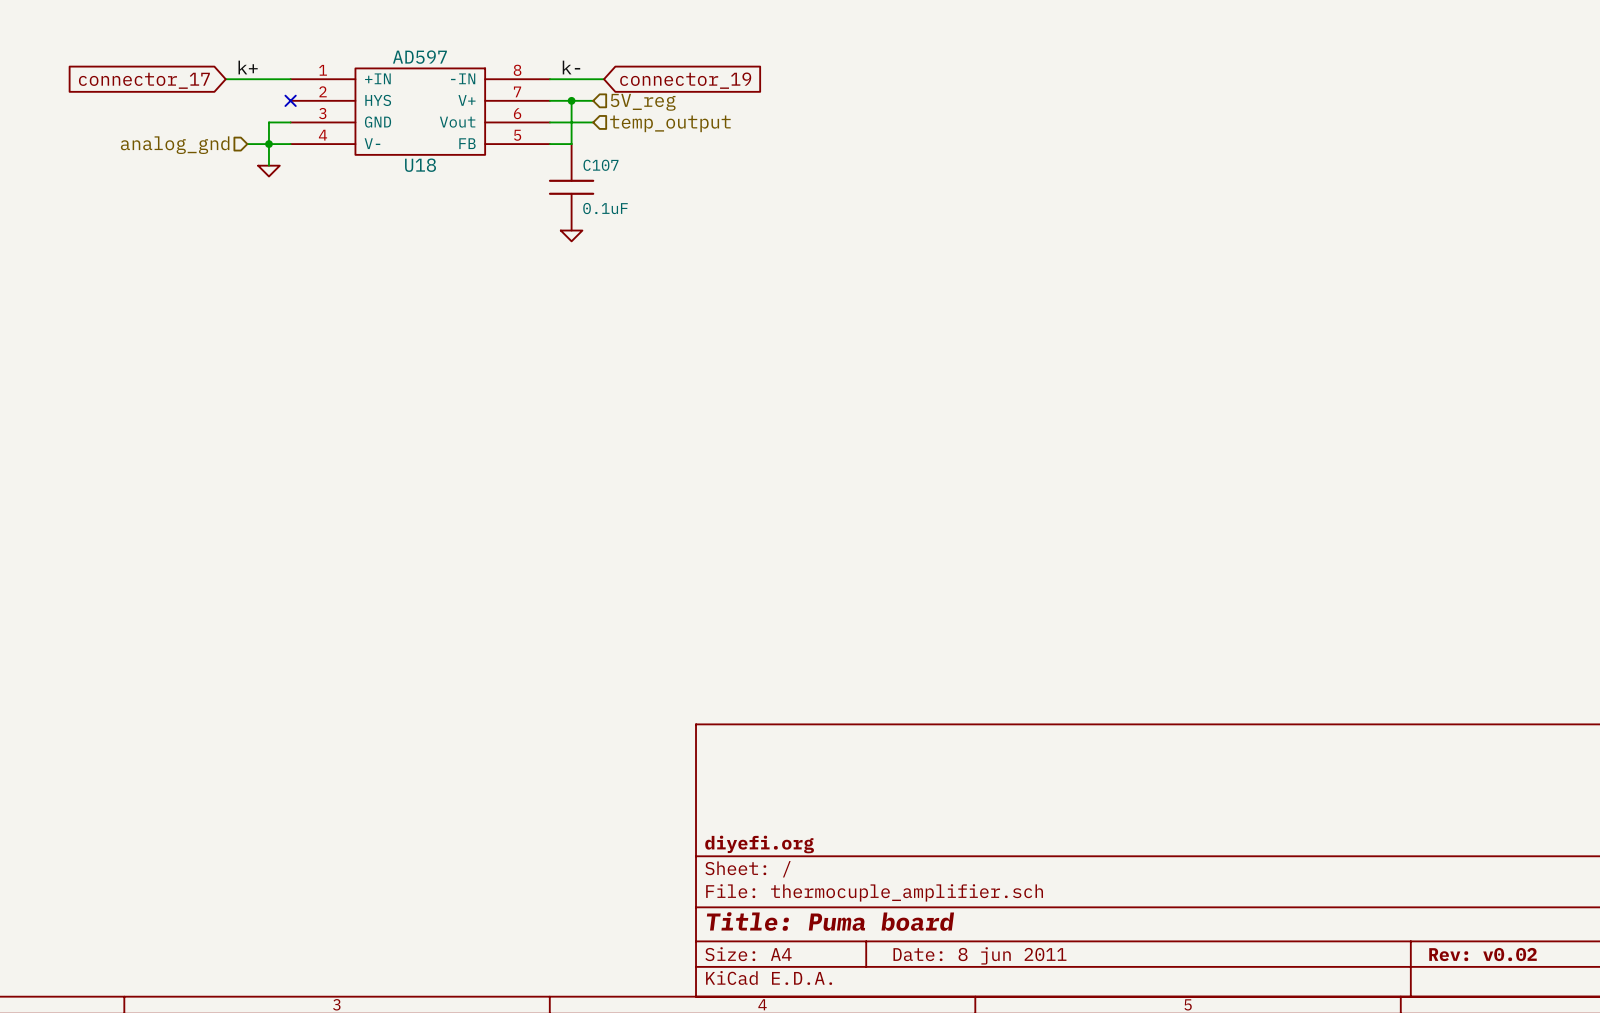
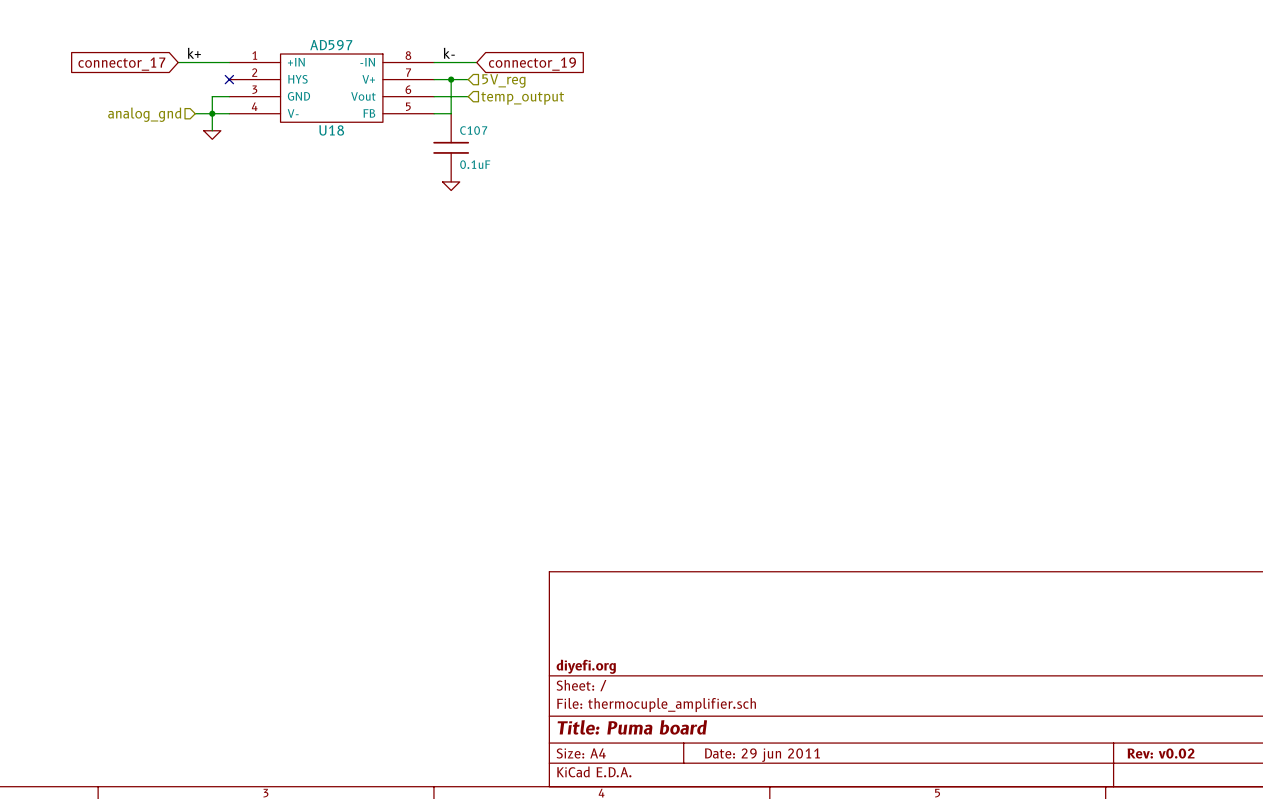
title block: Date: 8 jun 2011 (979, 955) -> Date: 29 jun 2011 (762, 755)

